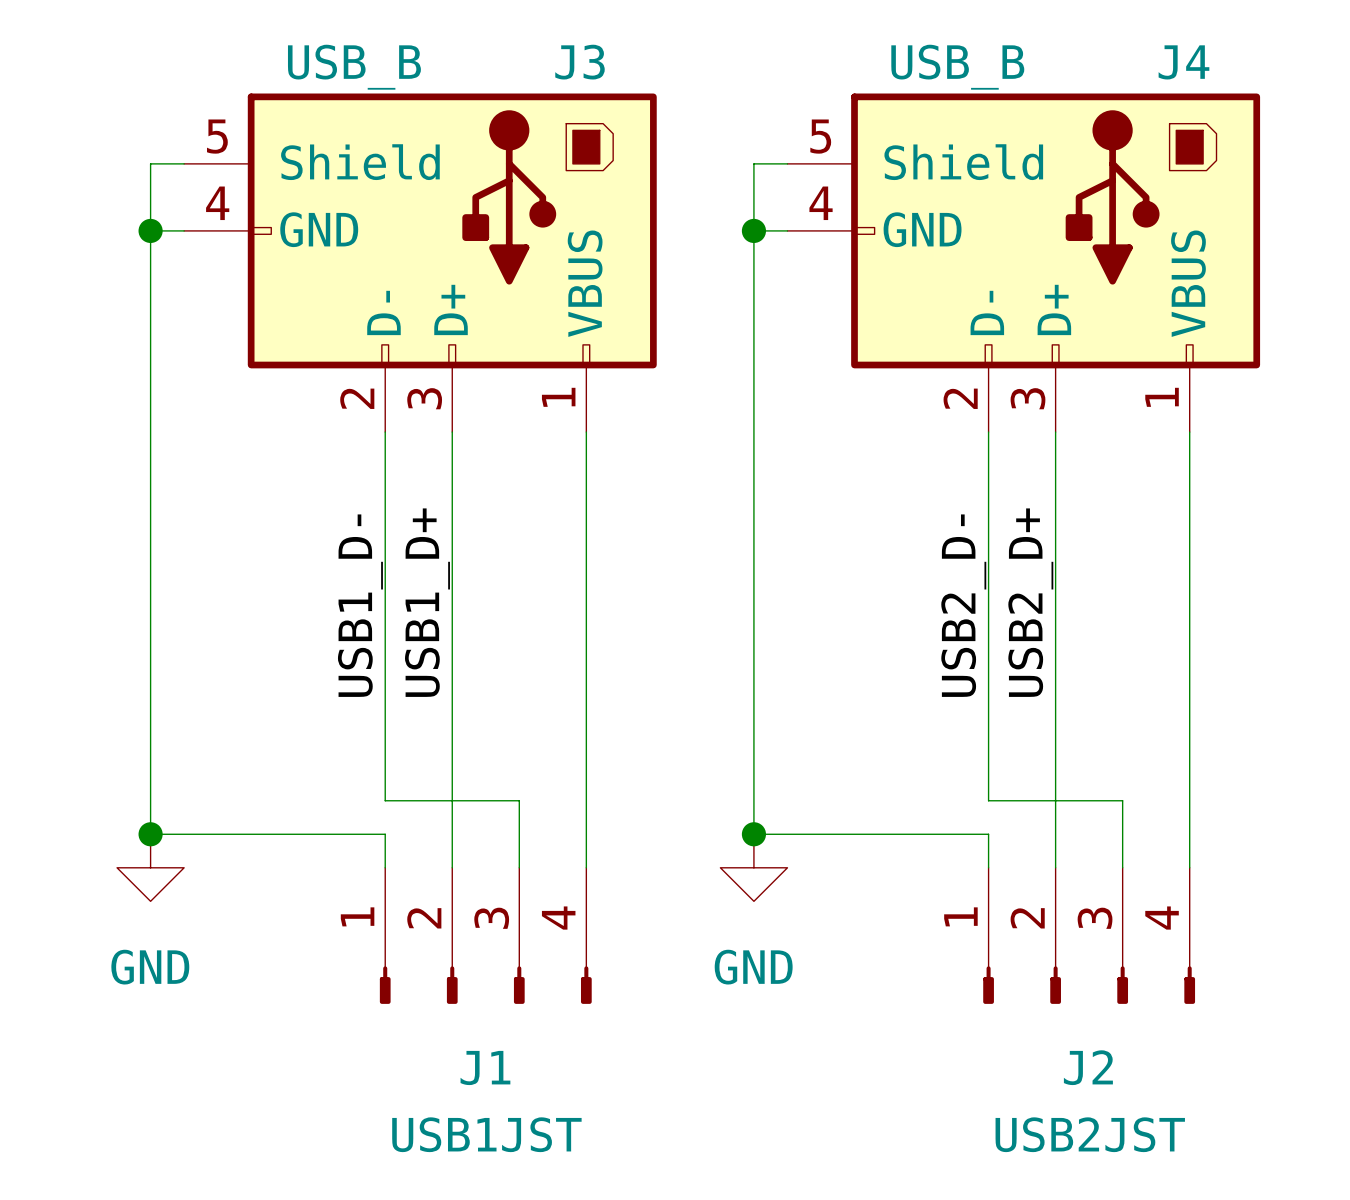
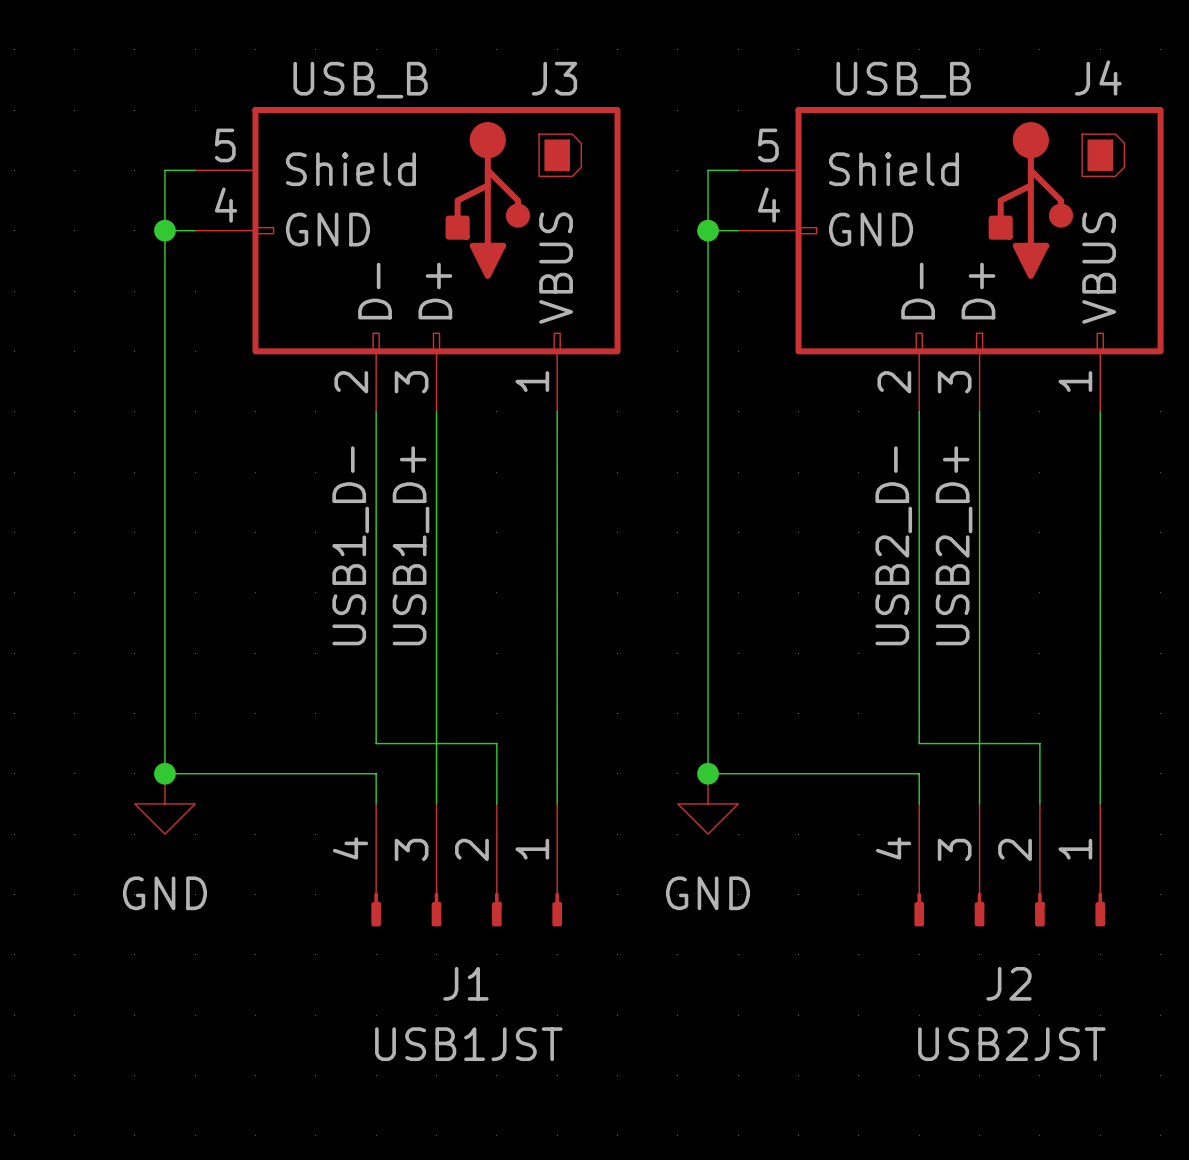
J1 flip: as is (485, 985) -> left-right (466, 909)
J2 flip: as is (1089, 985) -> left-right (1009, 909)

